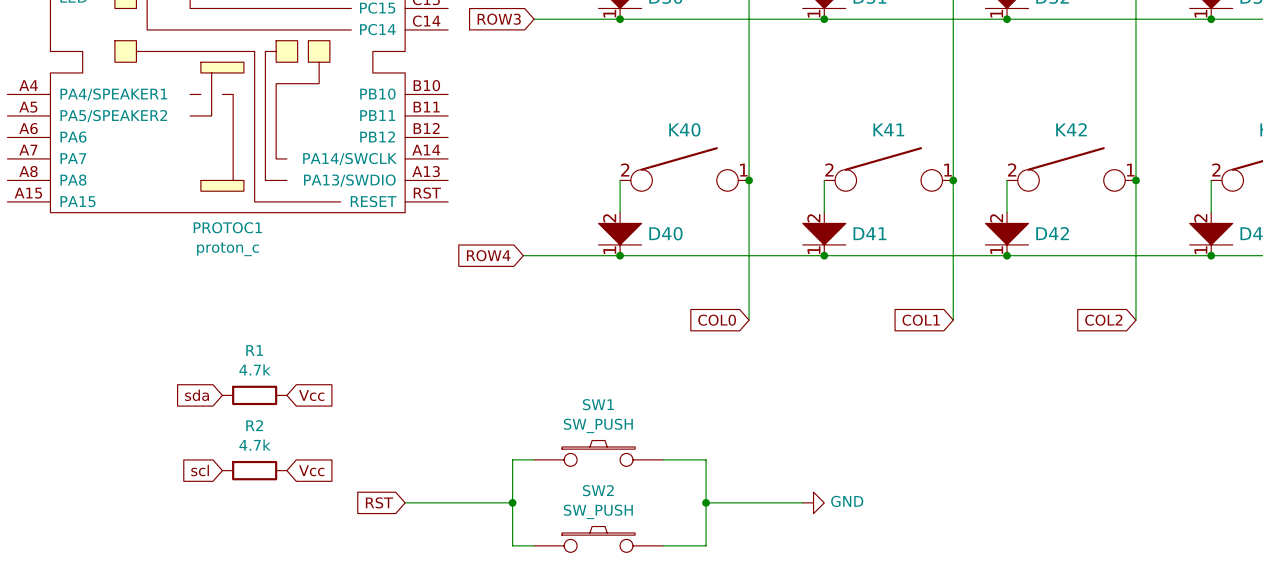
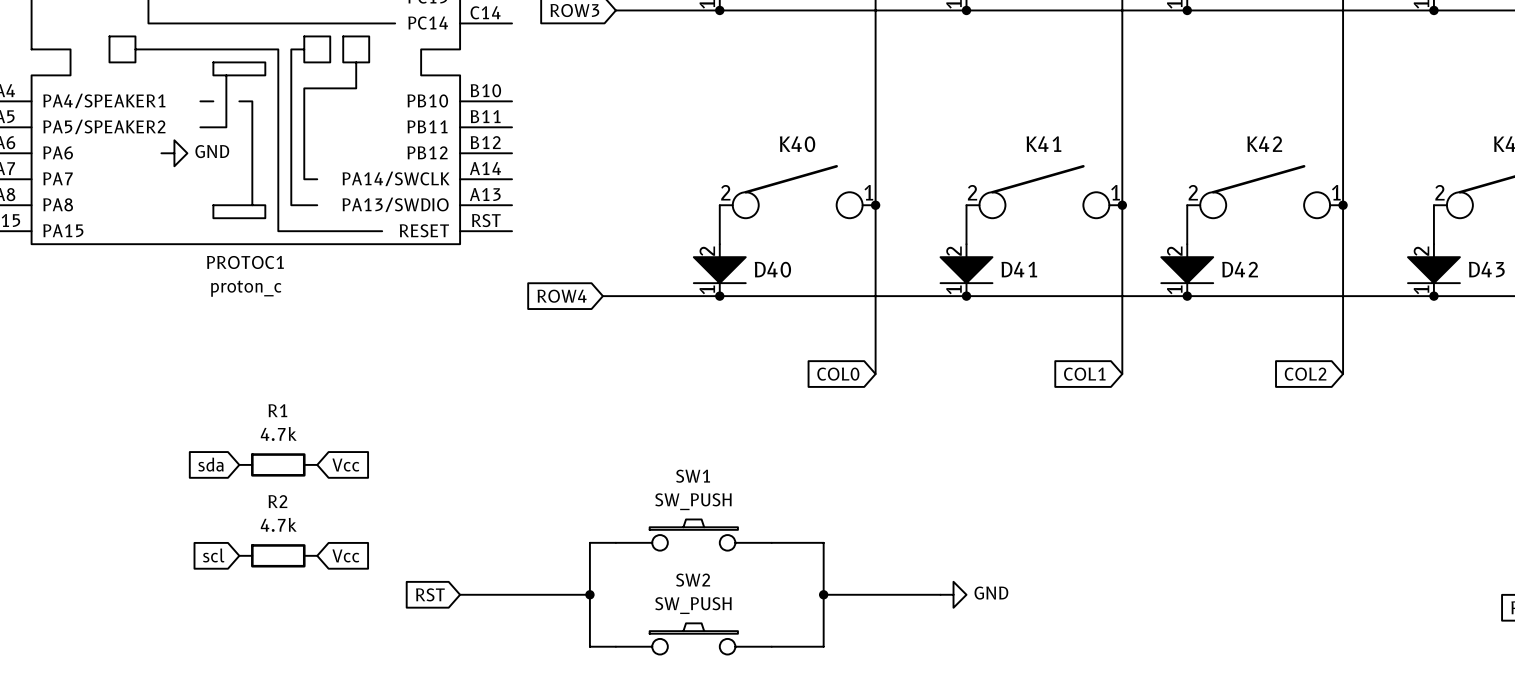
power symbol: none -> GND (174, 153)

